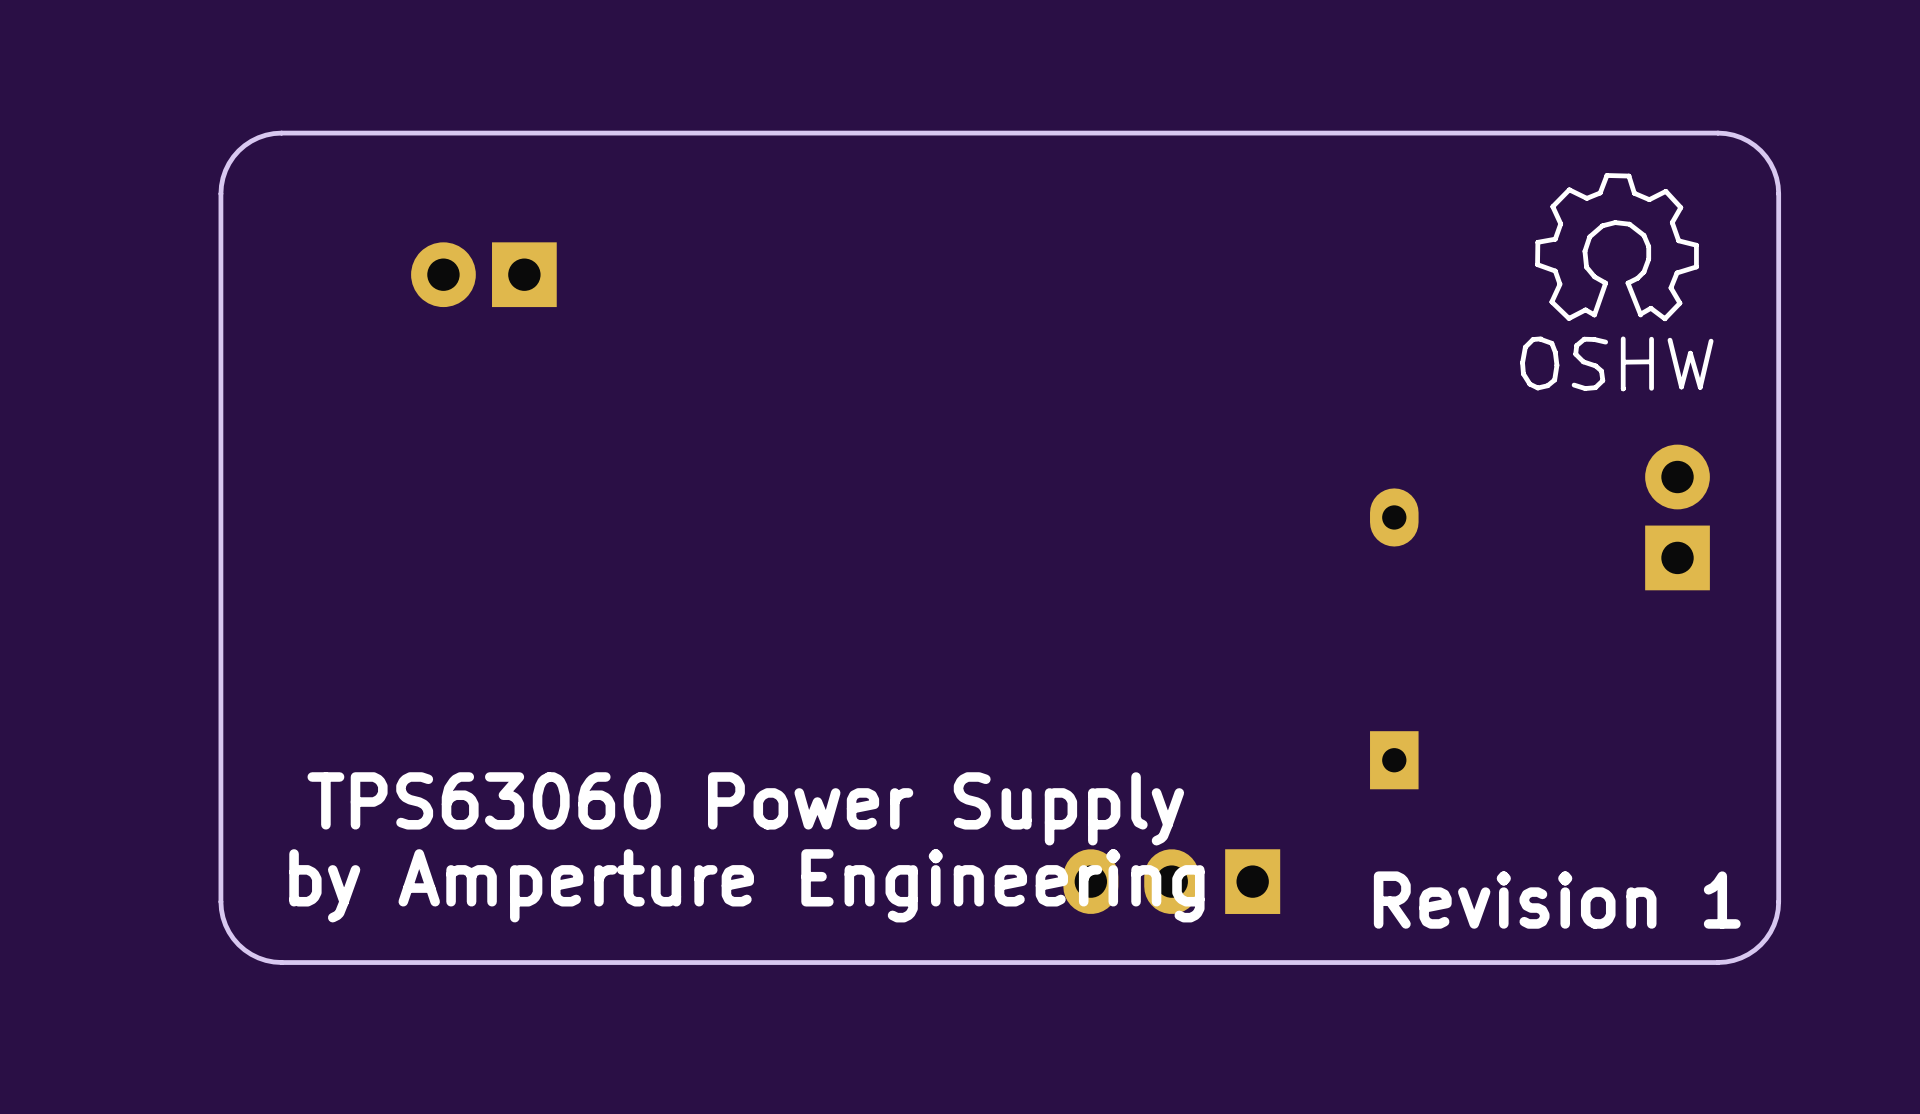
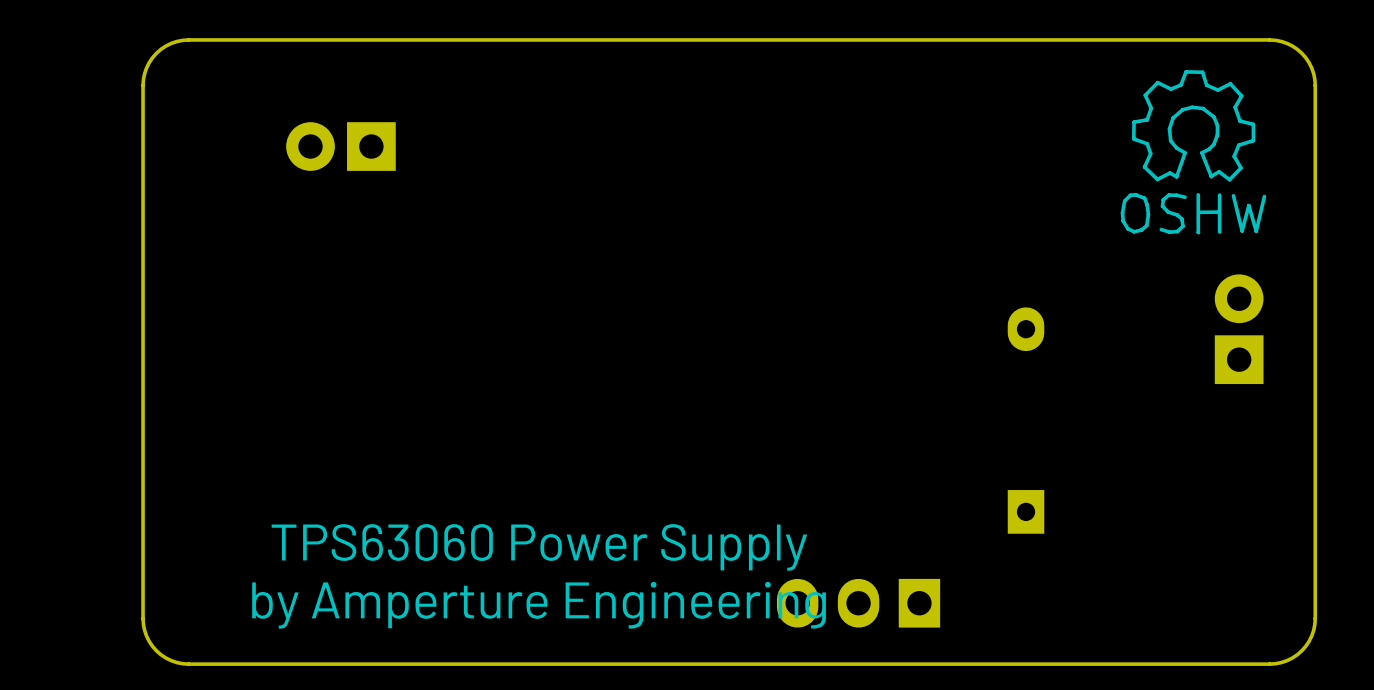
text: Revision 1 (1557, 900) -> none

